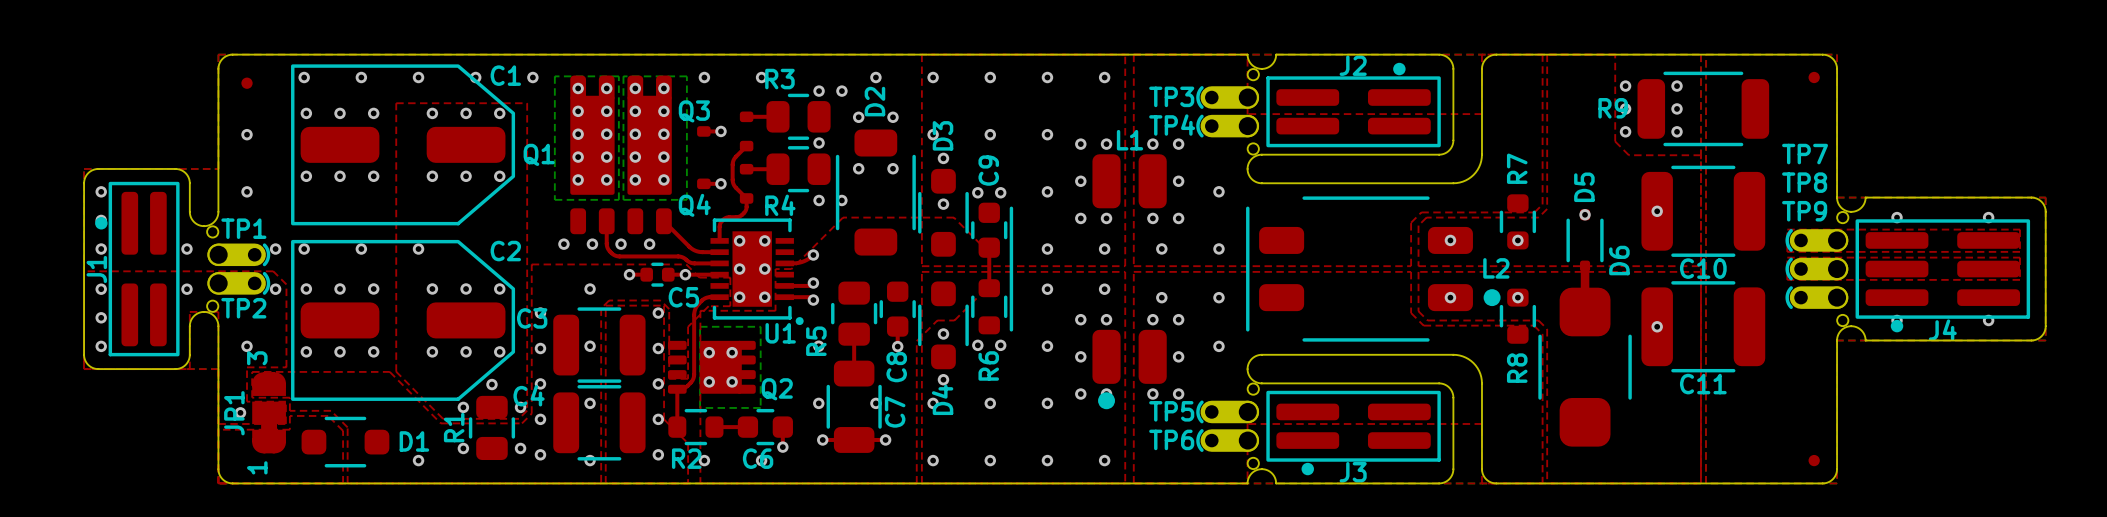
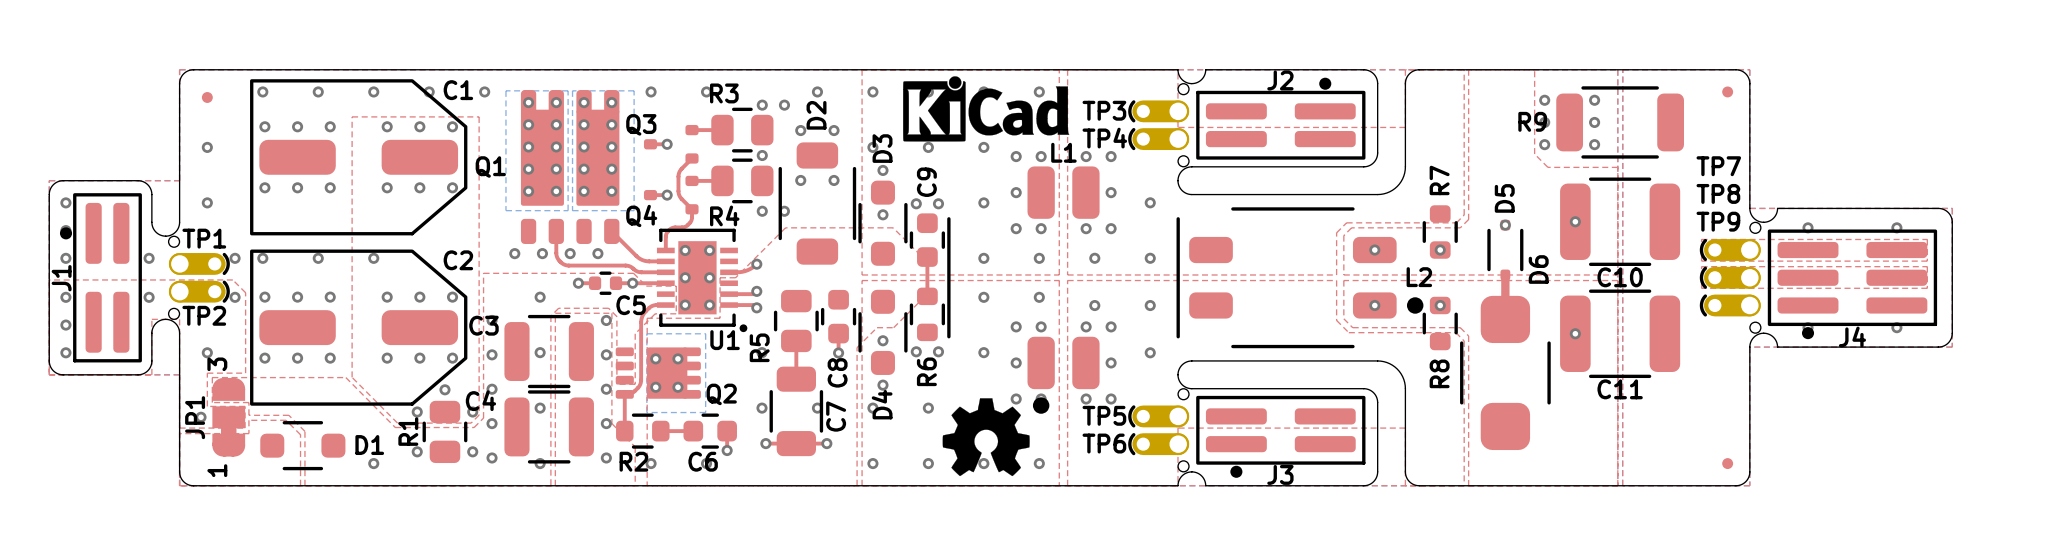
drawing: none -> [903, 76, 1070, 142]
drawing: none -> [942, 398, 1030, 477]

